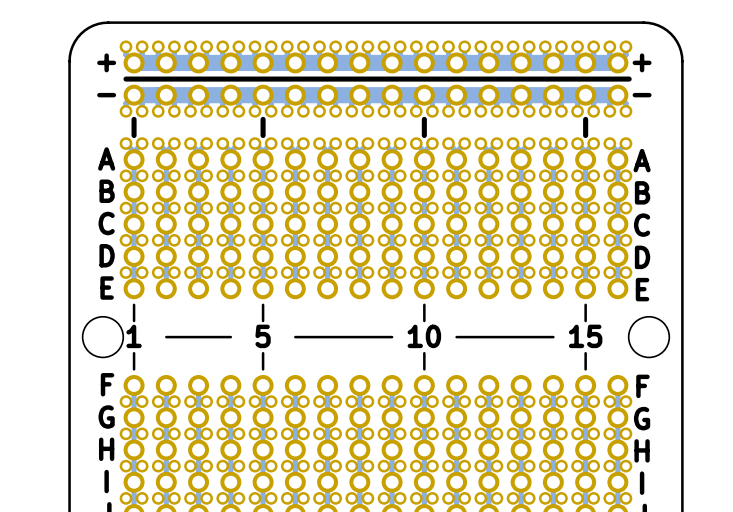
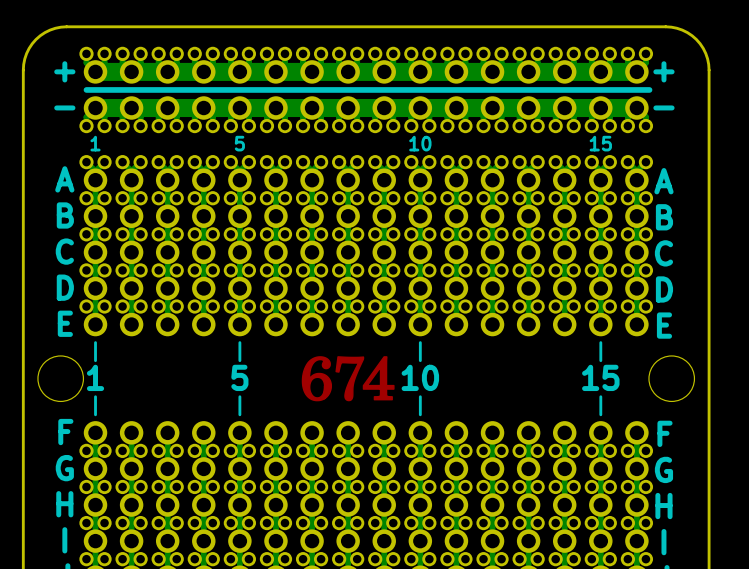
line: (134, 119) (134, 135) -> none
line: (263, 119) (263, 135) -> none
line: (424, 119) (424, 135) -> none
line: (585, 119) (585, 135) -> none
text: none -> 1 (95, 143)
text: none -> 5 (239, 143)
text: none -> 10 (420, 143)
text: none -> 15 (600, 143)
drawing: none -> [301, 356, 395, 402]
line: (166, 337) (230, 337) -> none
line: (295, 337) (392, 337) -> none
line: (456, 337) (553, 337) -> none

